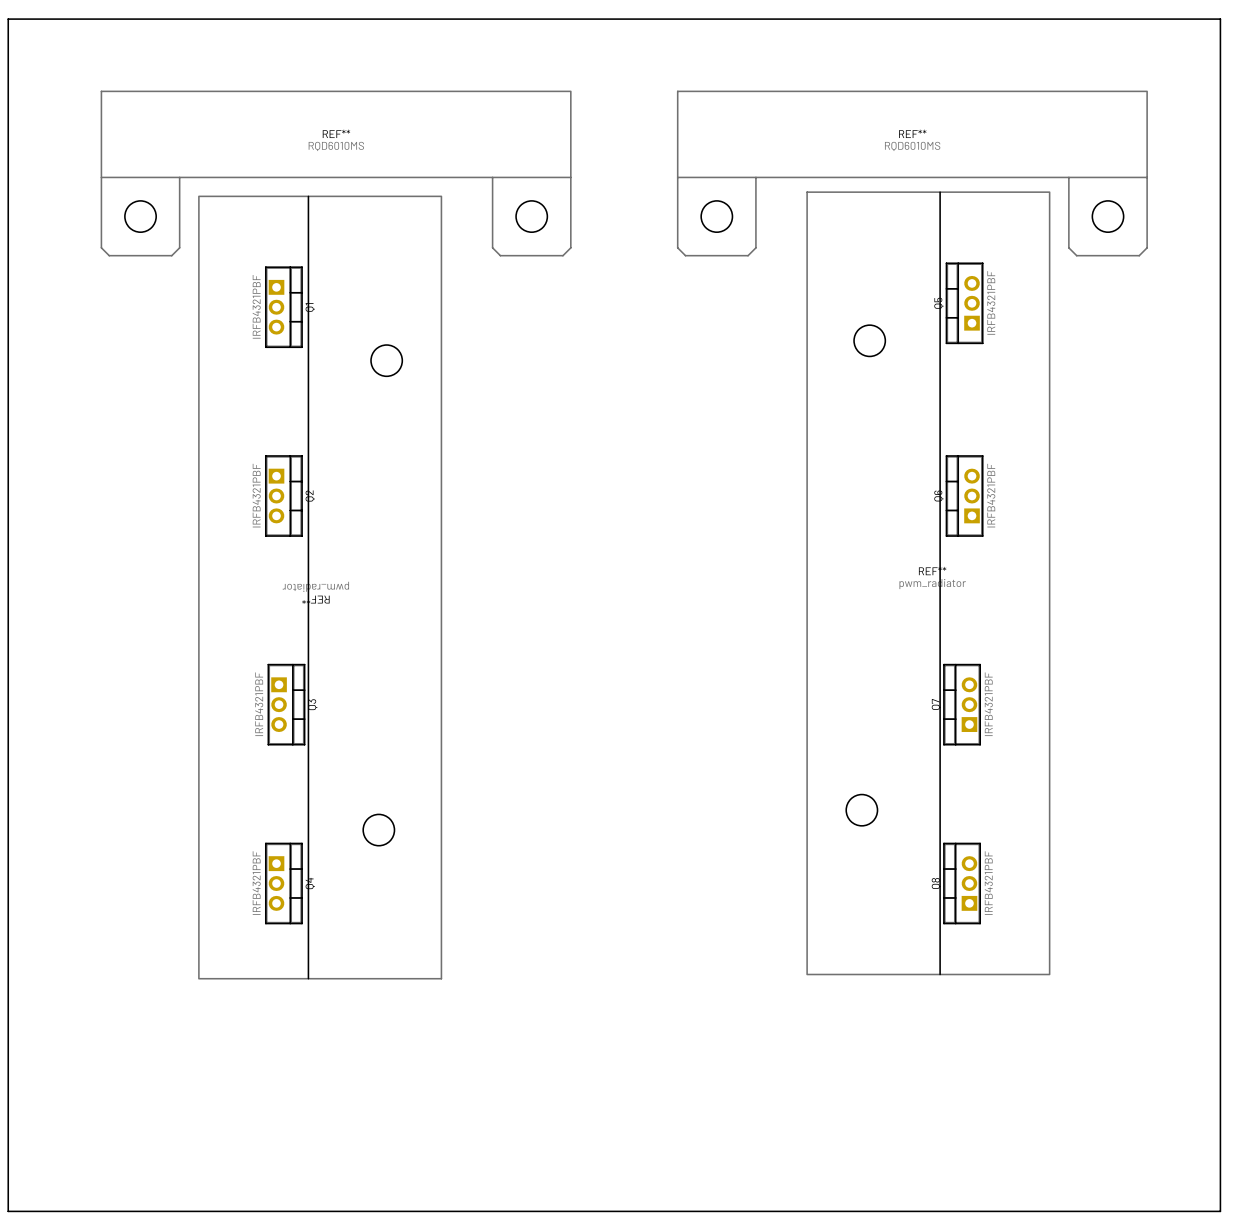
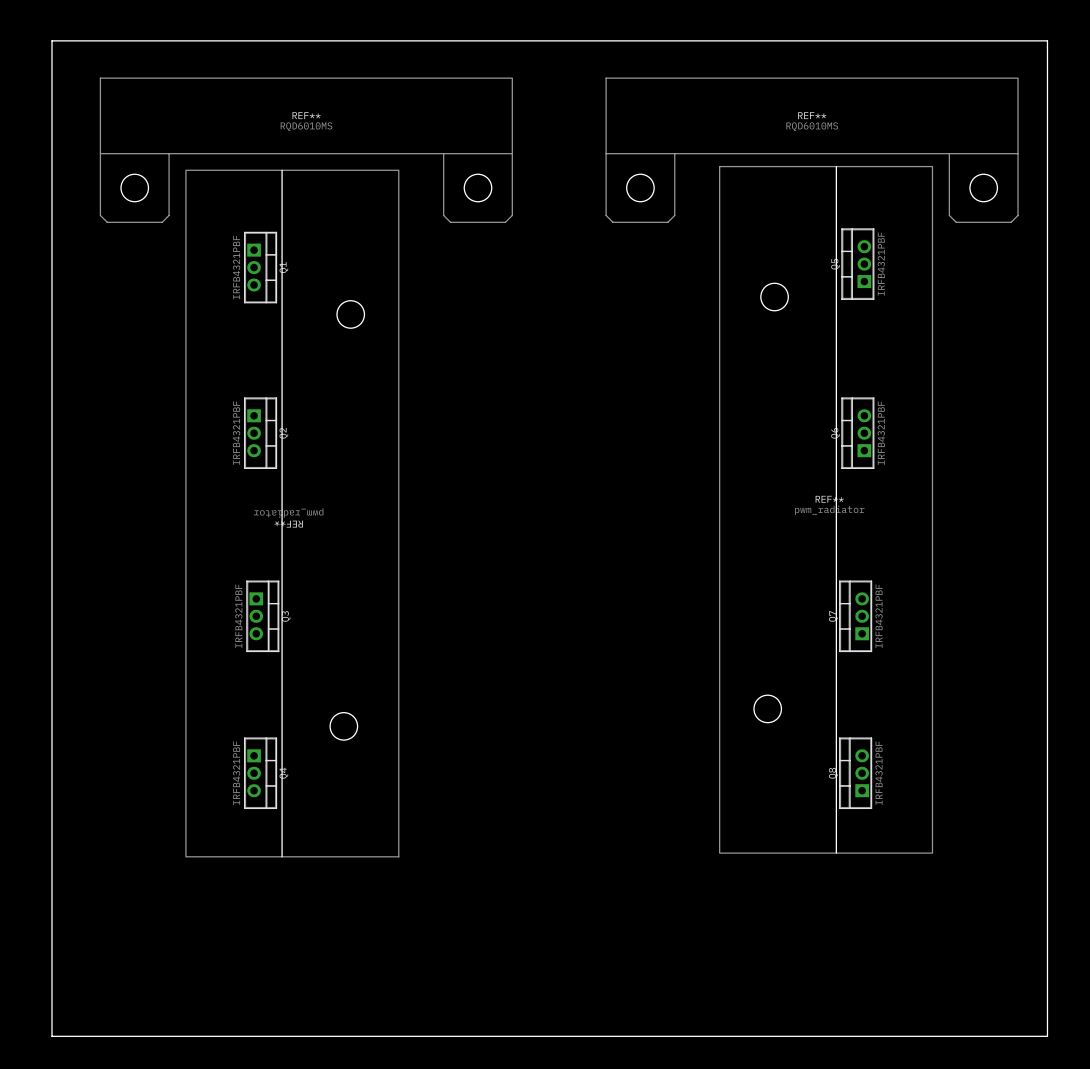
board edge: (8, 19) (1220, 19) (1220, 1211) (8, 1211) (8, 19) -> (52, 40) (52, 1036) (1047, 1036) (1047, 40) (52, 40)

